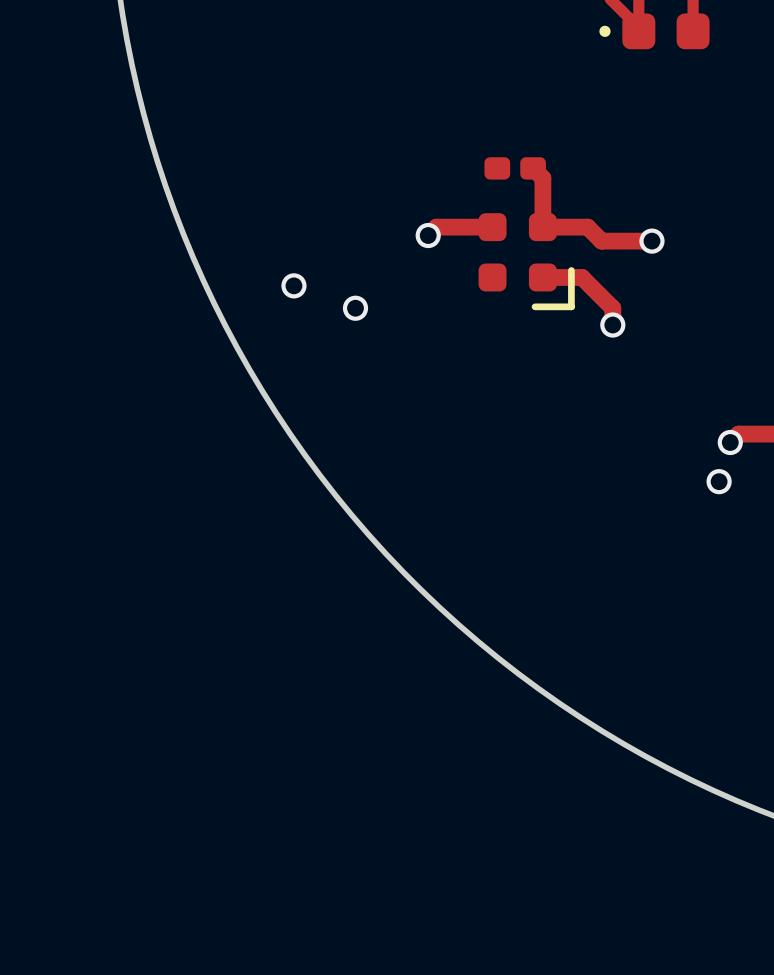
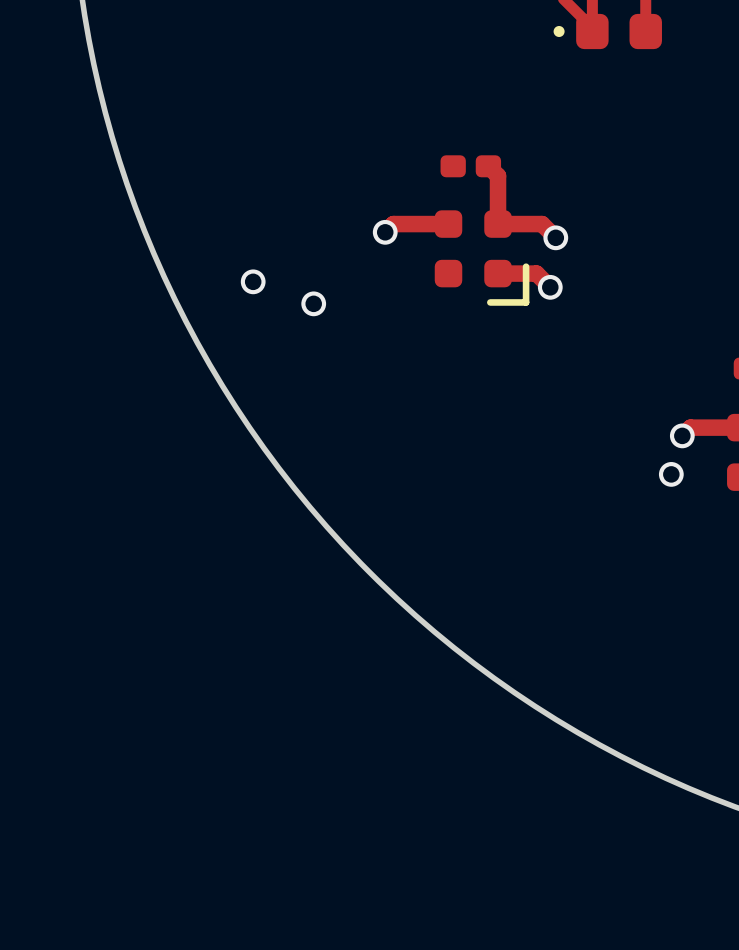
track: (601, 241) (651, 241) -> none
via: none -> (555, 237)
via: (651, 241) -> none
track: (596, 291) (612, 308) (612, 325) -> none
via: none -> (550, 287)
via: (612, 325) -> none

